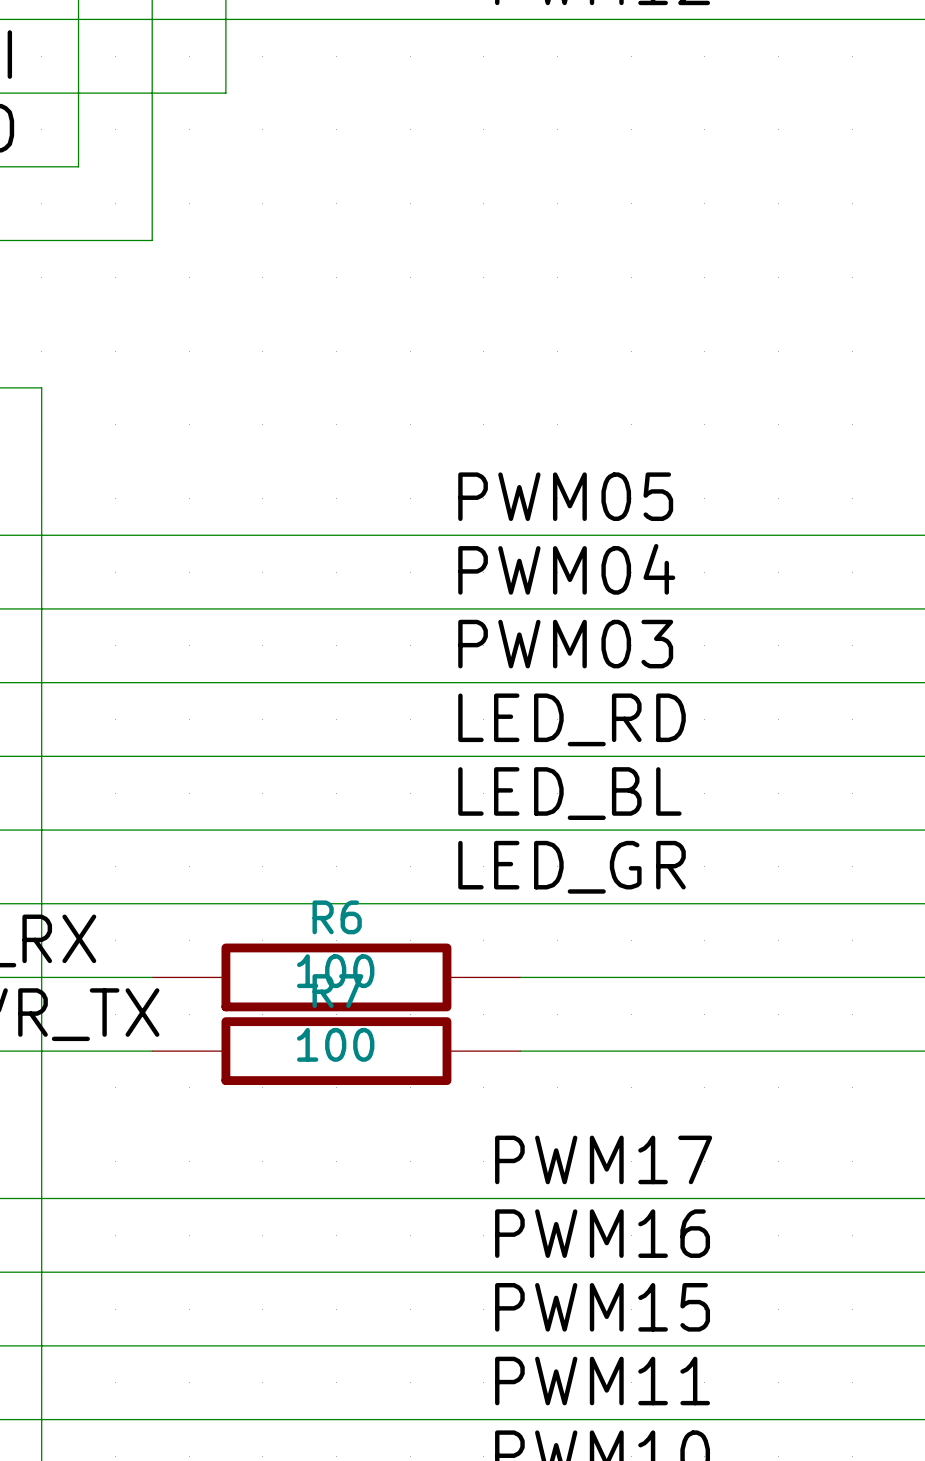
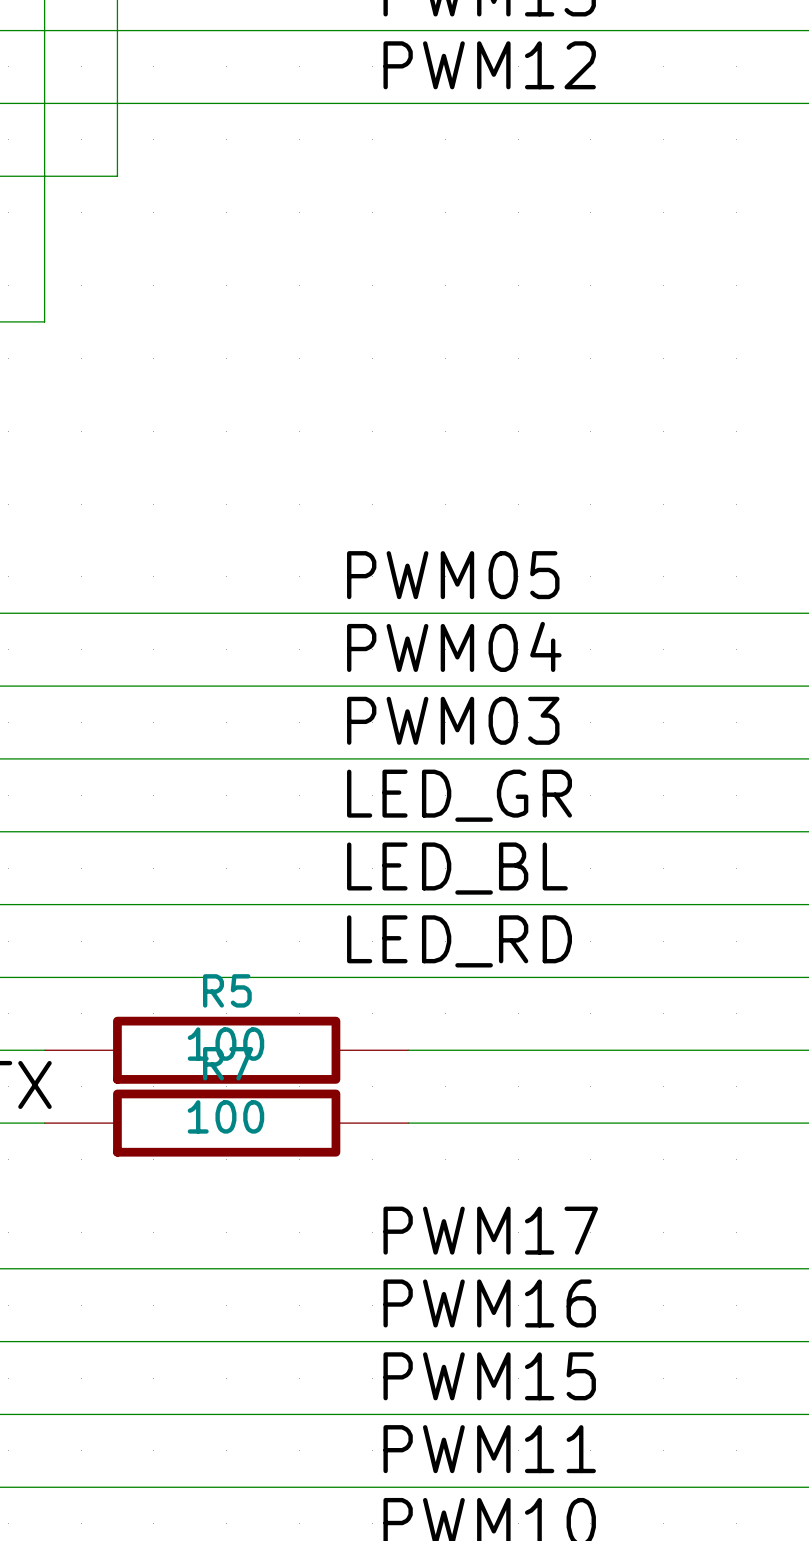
label: LED_RD (572, 719) -> LED_GR (459, 795)
label: LED_GR (572, 867) -> LED_RD (459, 941)
R6 name: R6 (337, 917) -> R5 (227, 990)

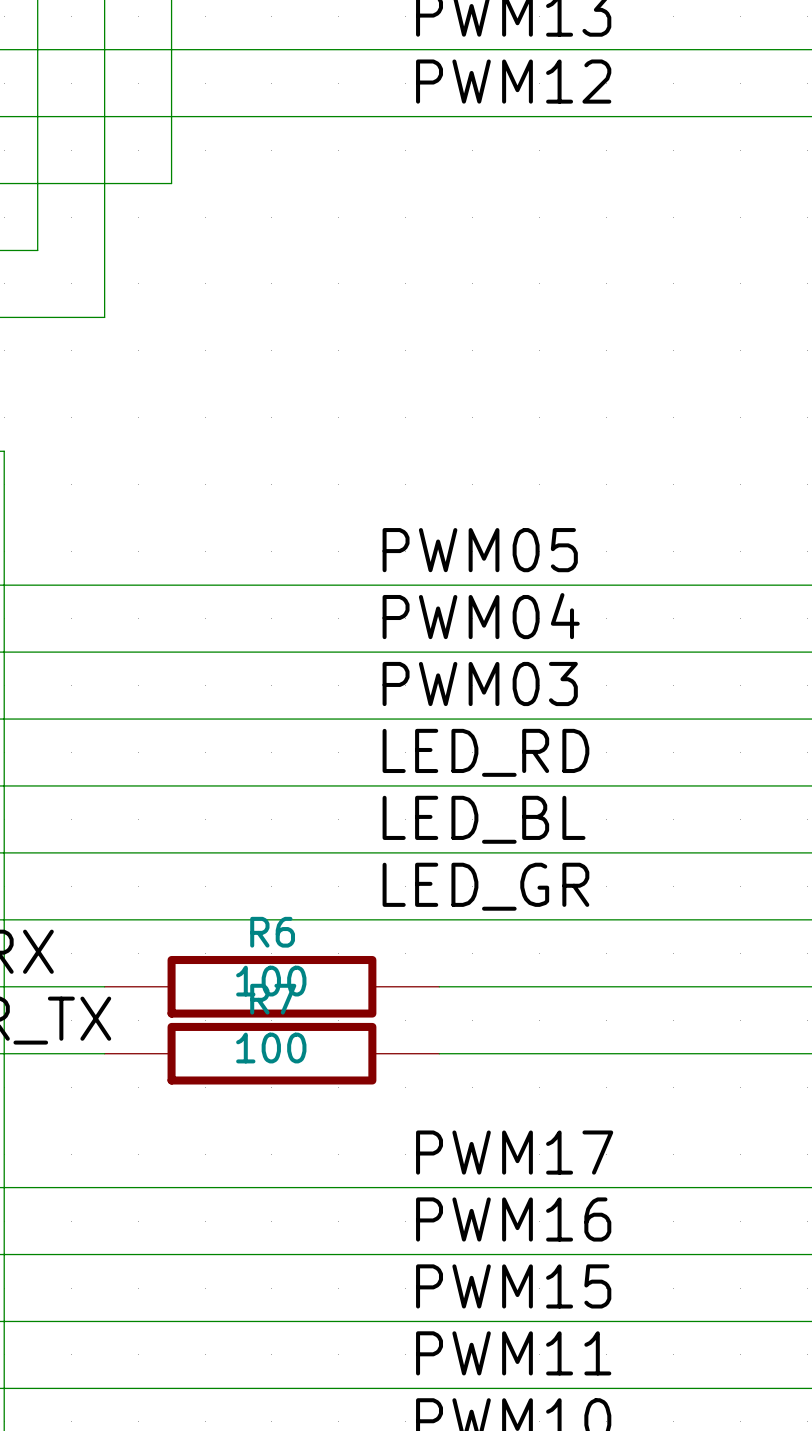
label: LED_GR (459, 795) -> LED_RD (485, 752)
label: LED_RD (459, 941) -> LED_GR (485, 886)
R5 name: R5 (227, 990) -> R6 (272, 932)

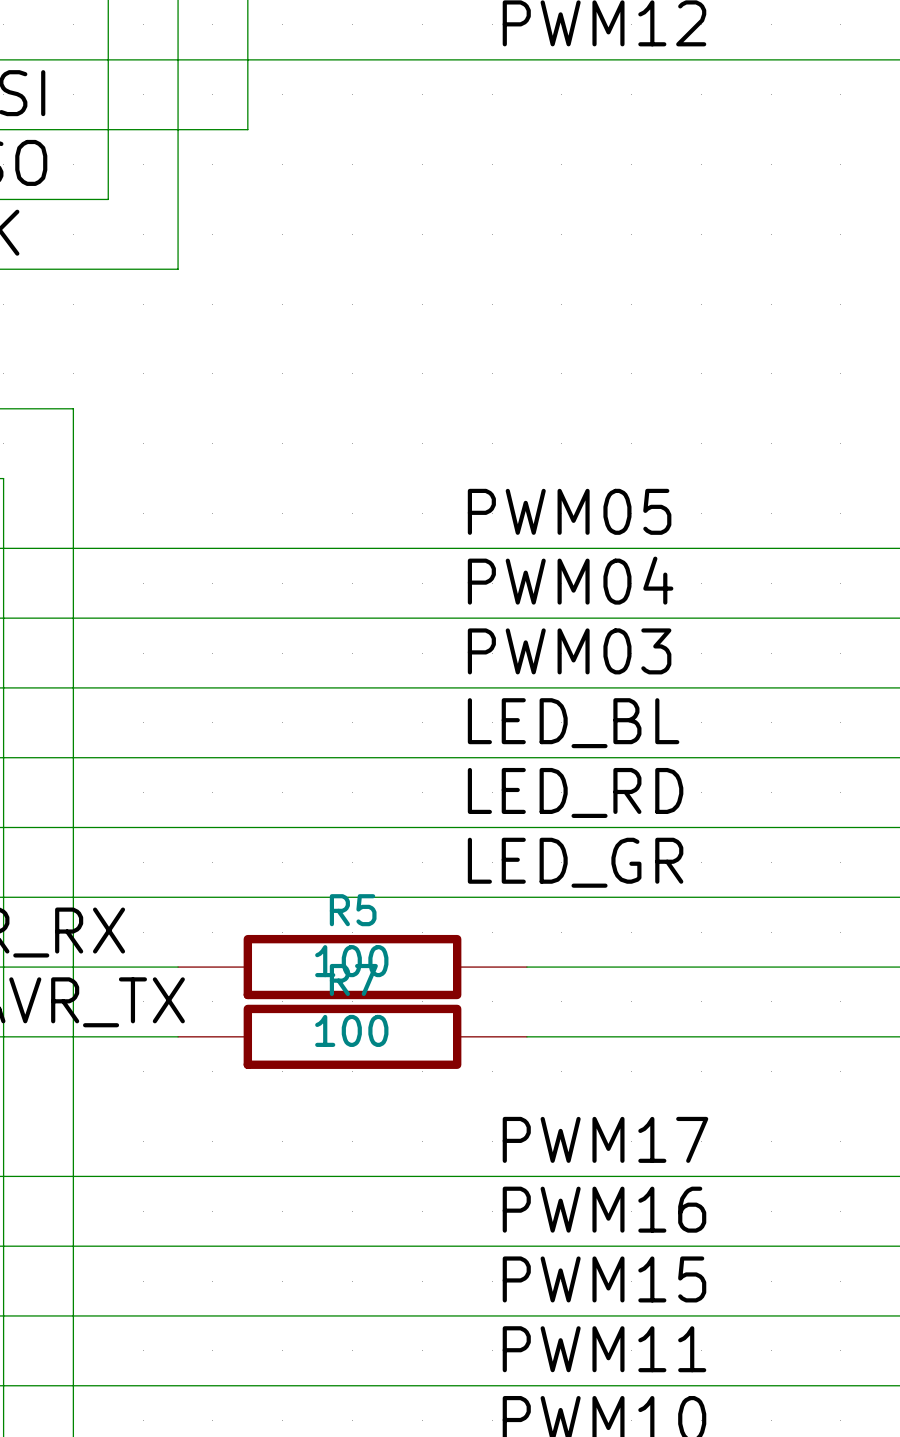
label: LED_RD (485, 752) -> LED_BL (573, 723)
label: LED_BL (484, 819) -> LED_RD (575, 792)
R6 name: R6 (272, 932) -> R5 (353, 910)

